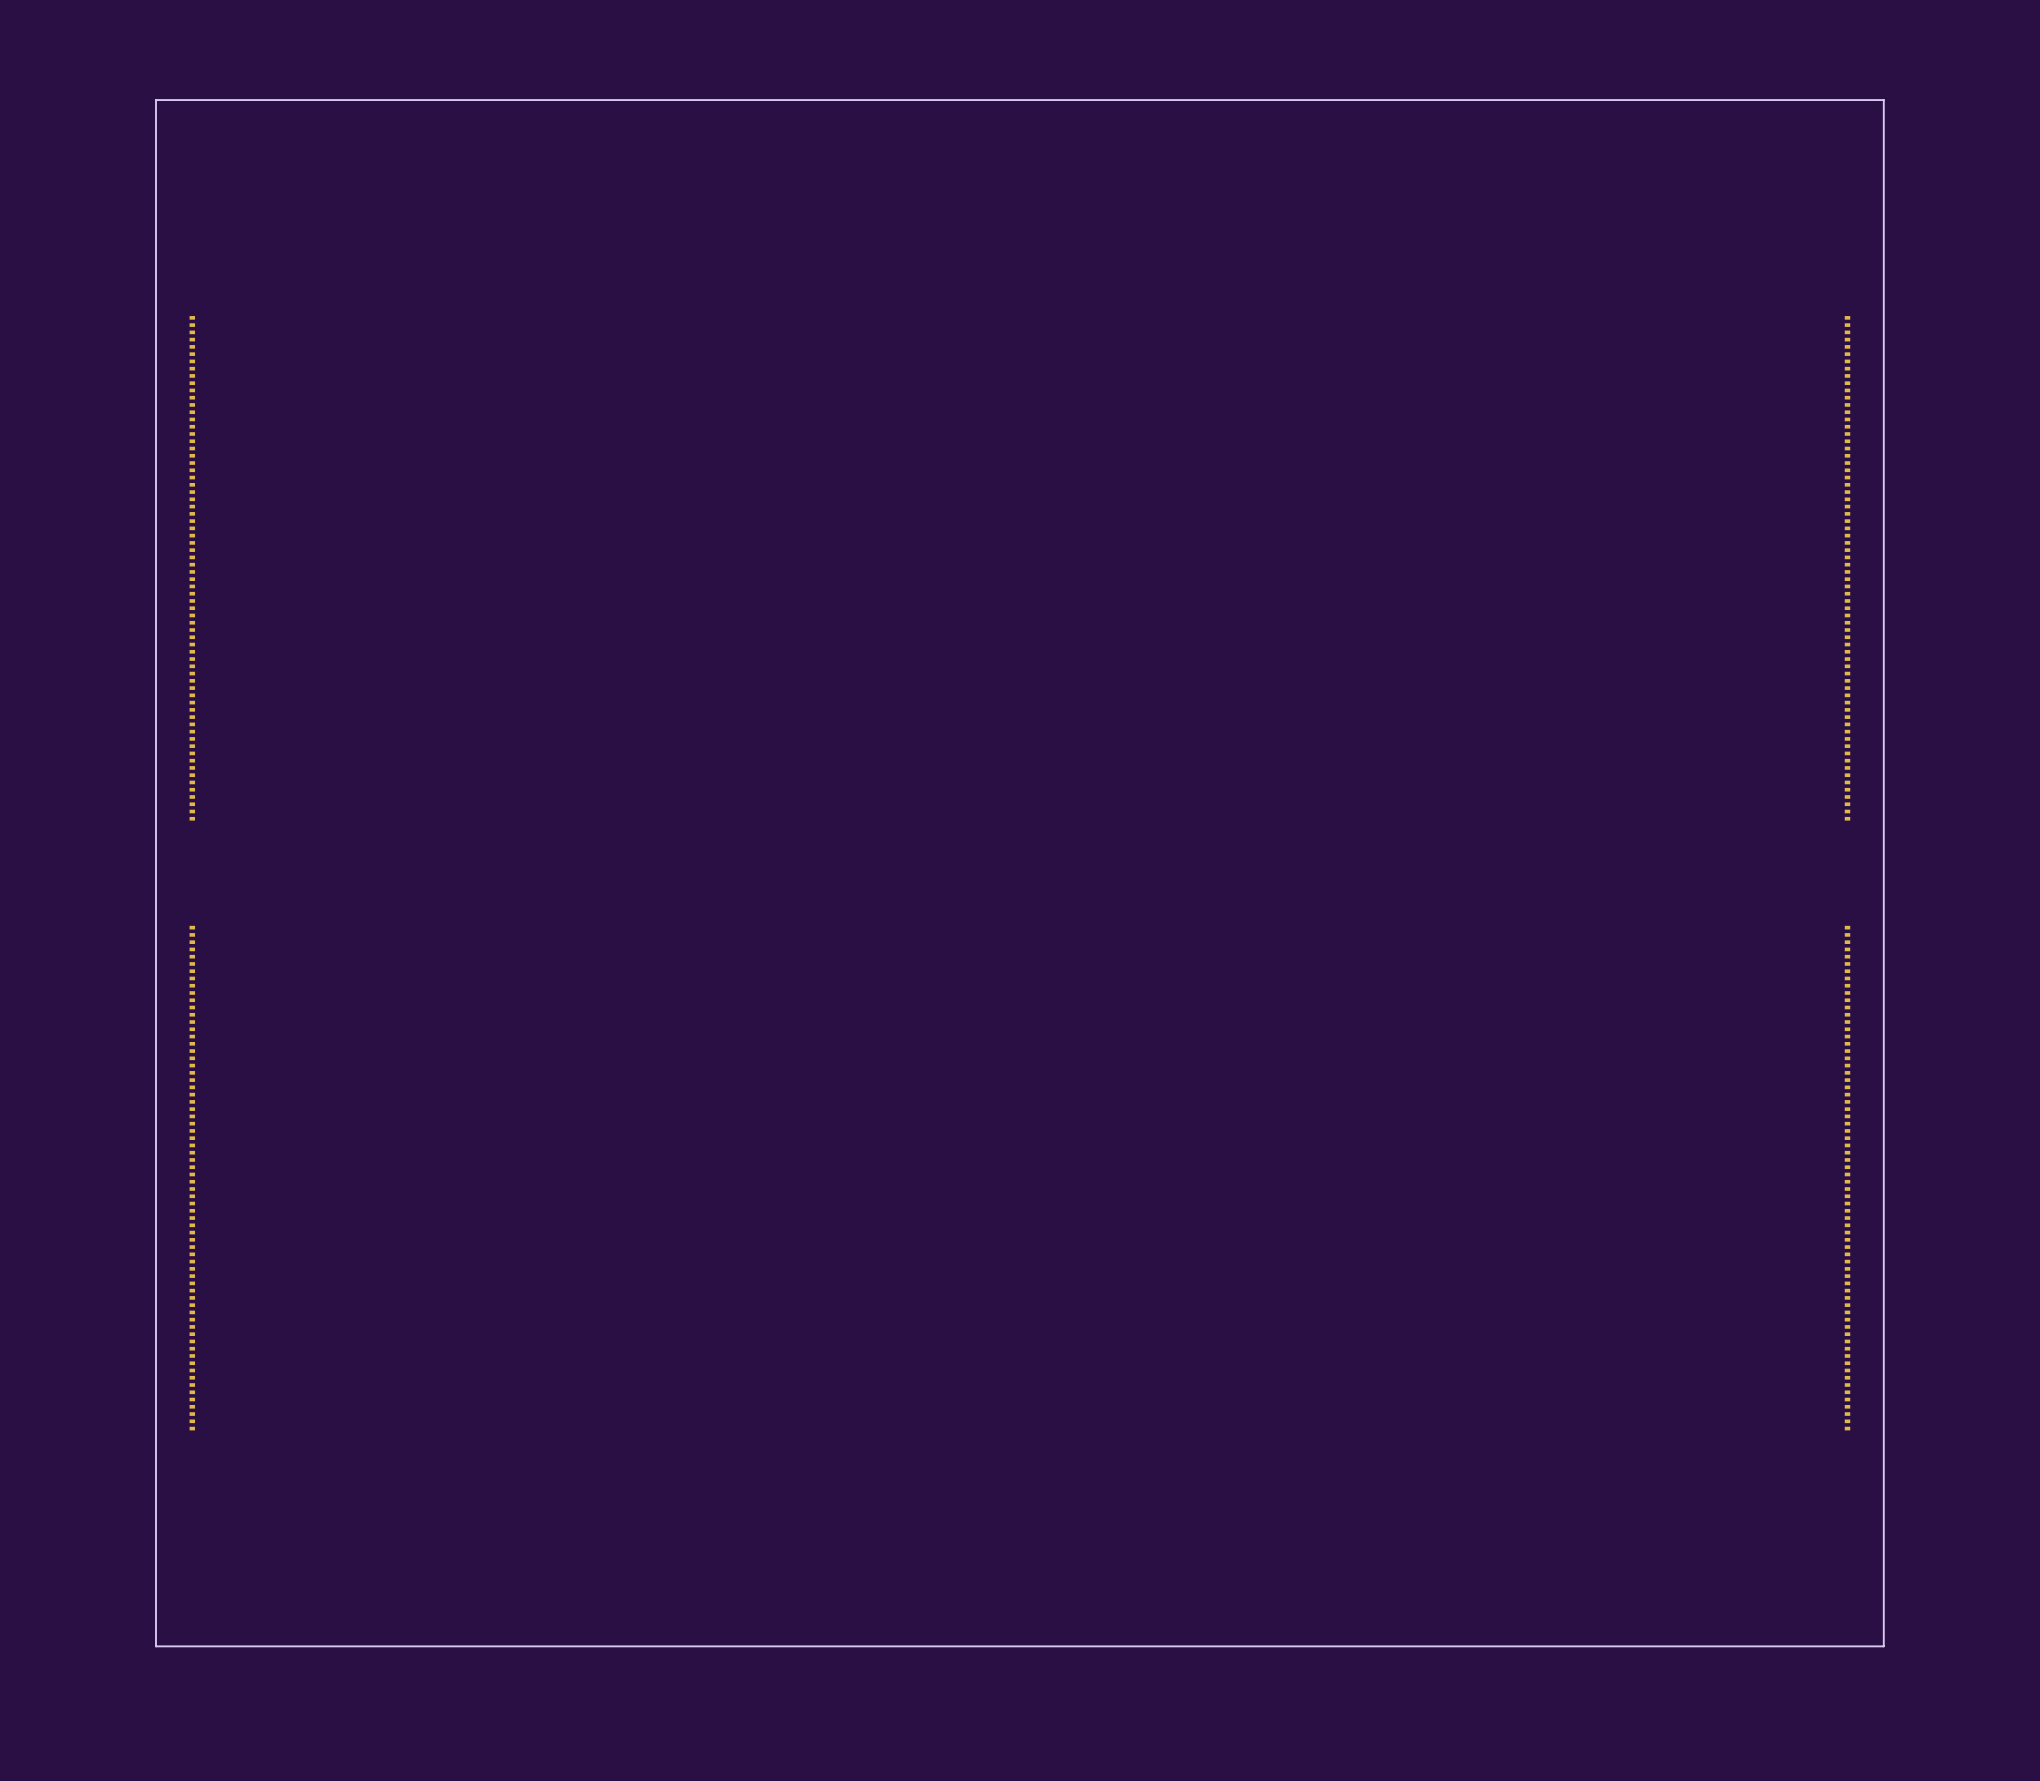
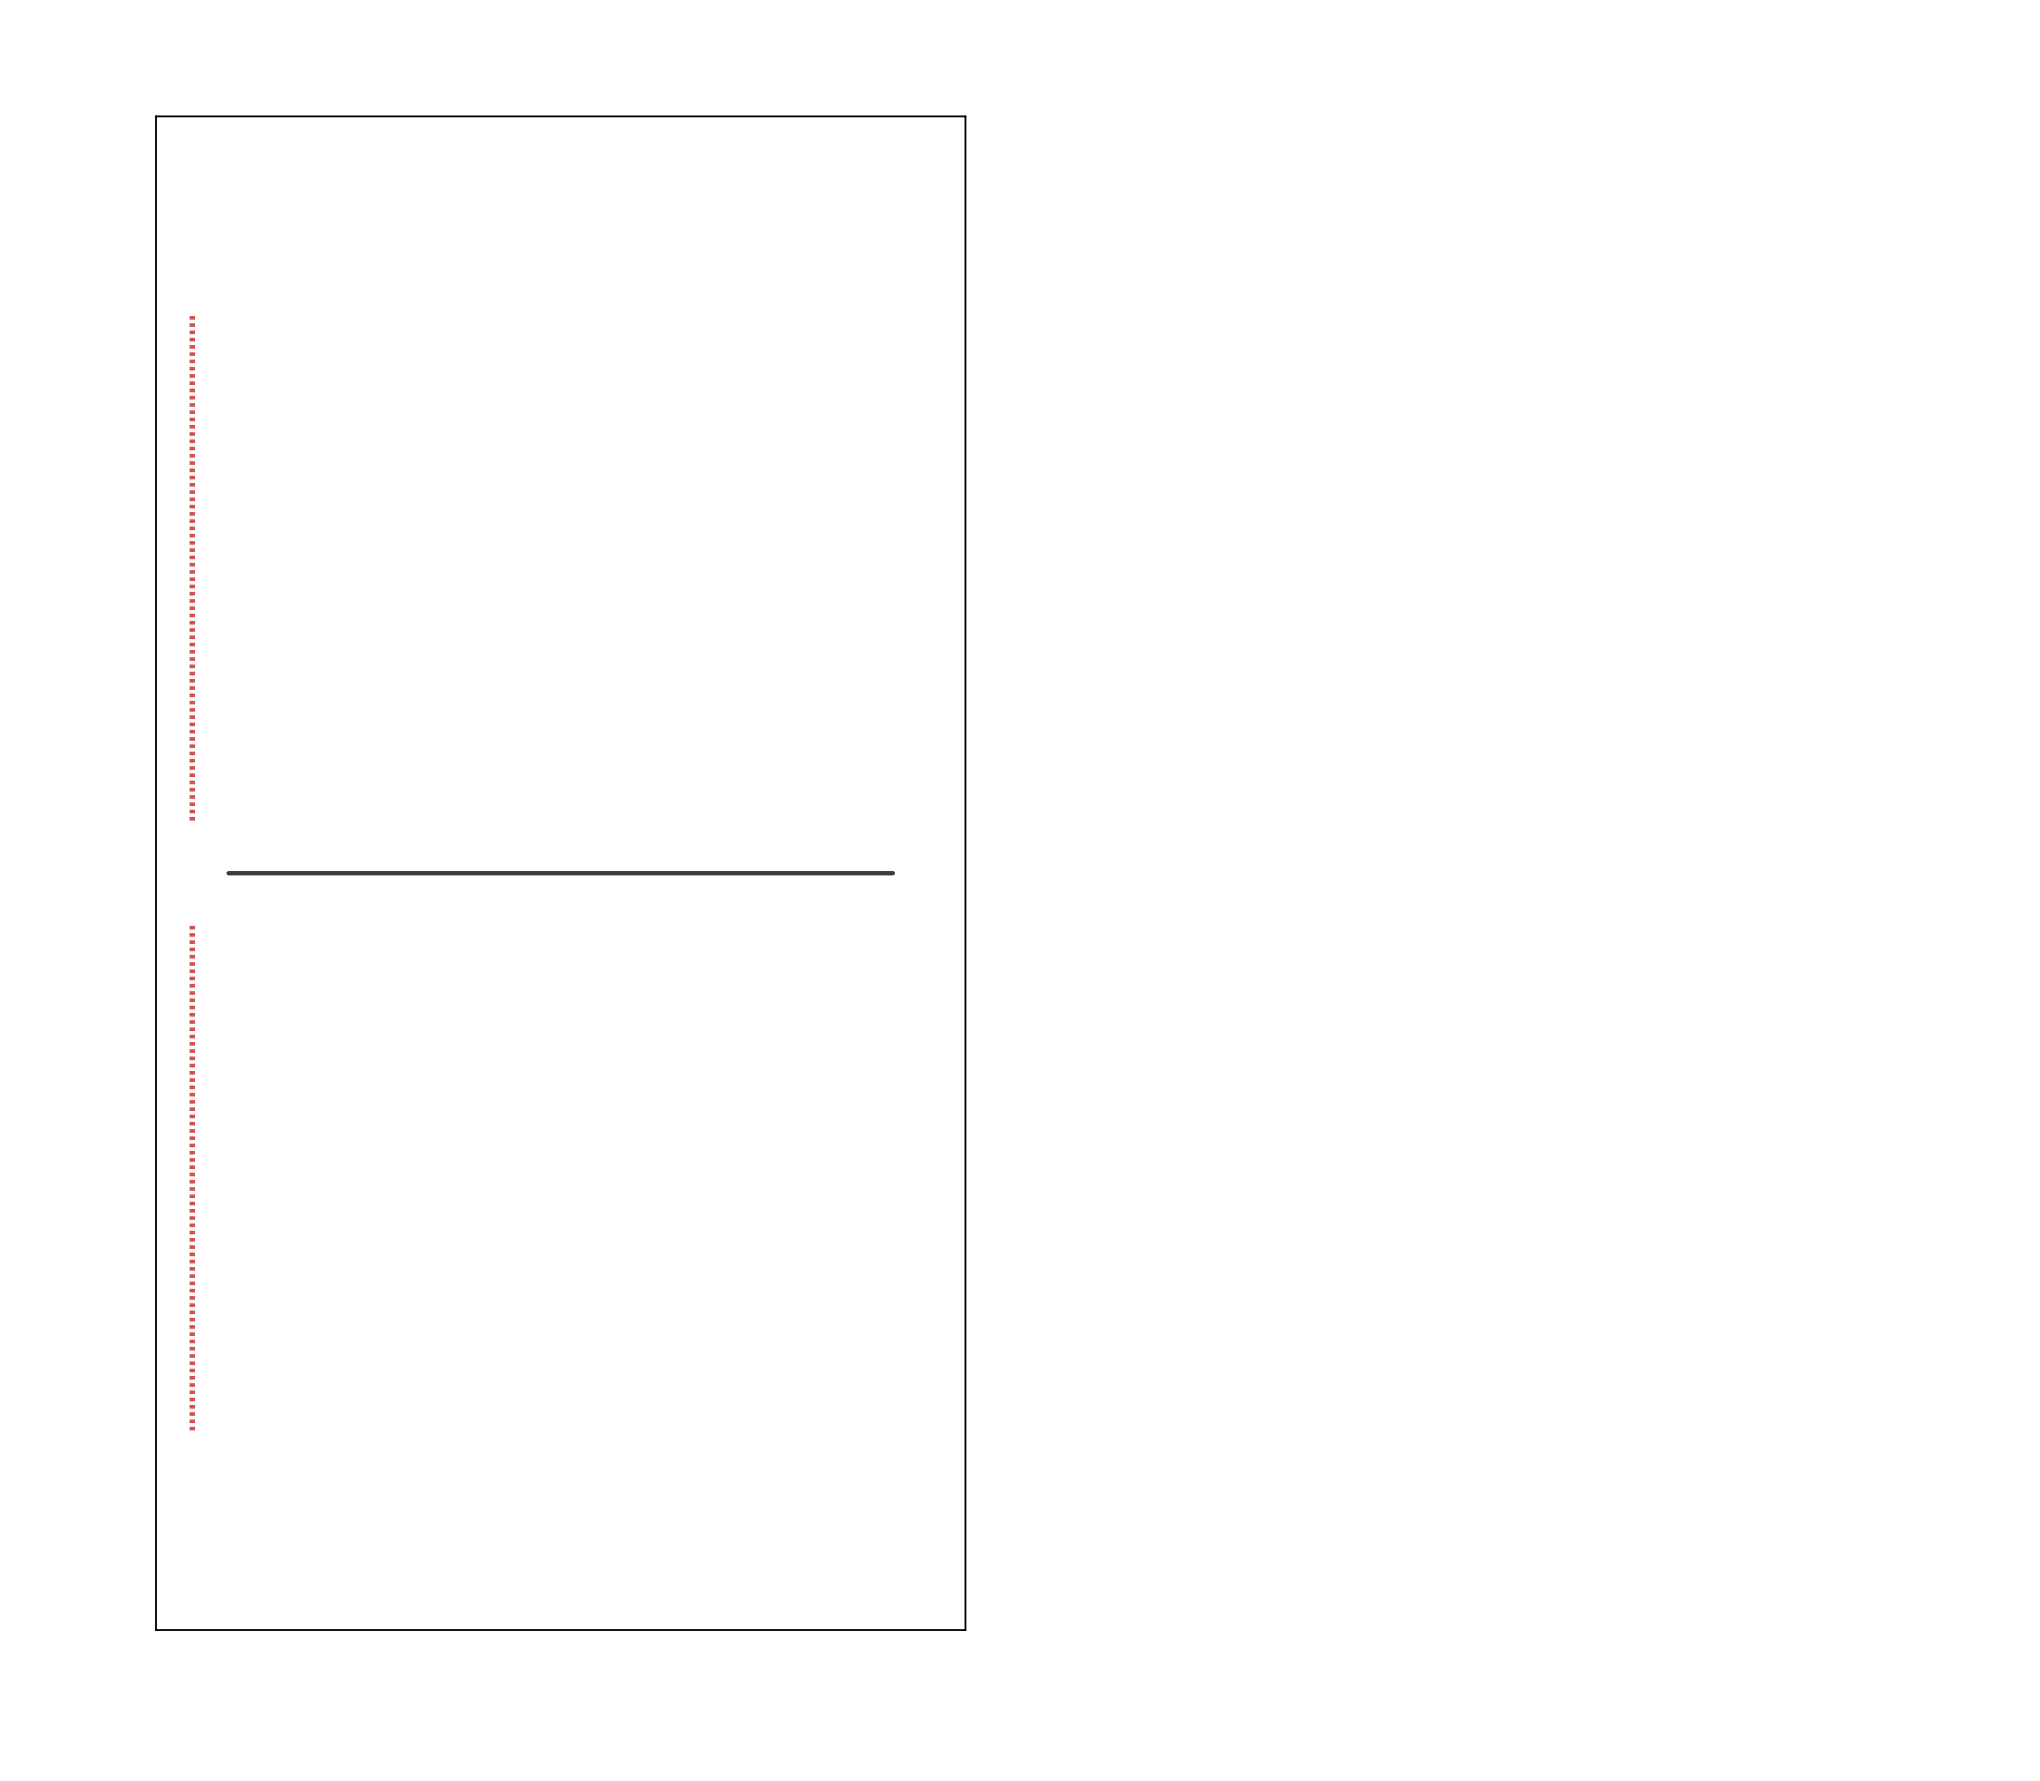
board edge: (156, 116) (156, 100) (1883, 100) (1883, 1646) (156, 1646) (156, 1630) -> (156, 116) (965, 116) (965, 1630) (156, 1630)
part: (1847, 568) -> none
line: none -> (228, 873) (892, 873)
part: (1847, 1178) -> none

